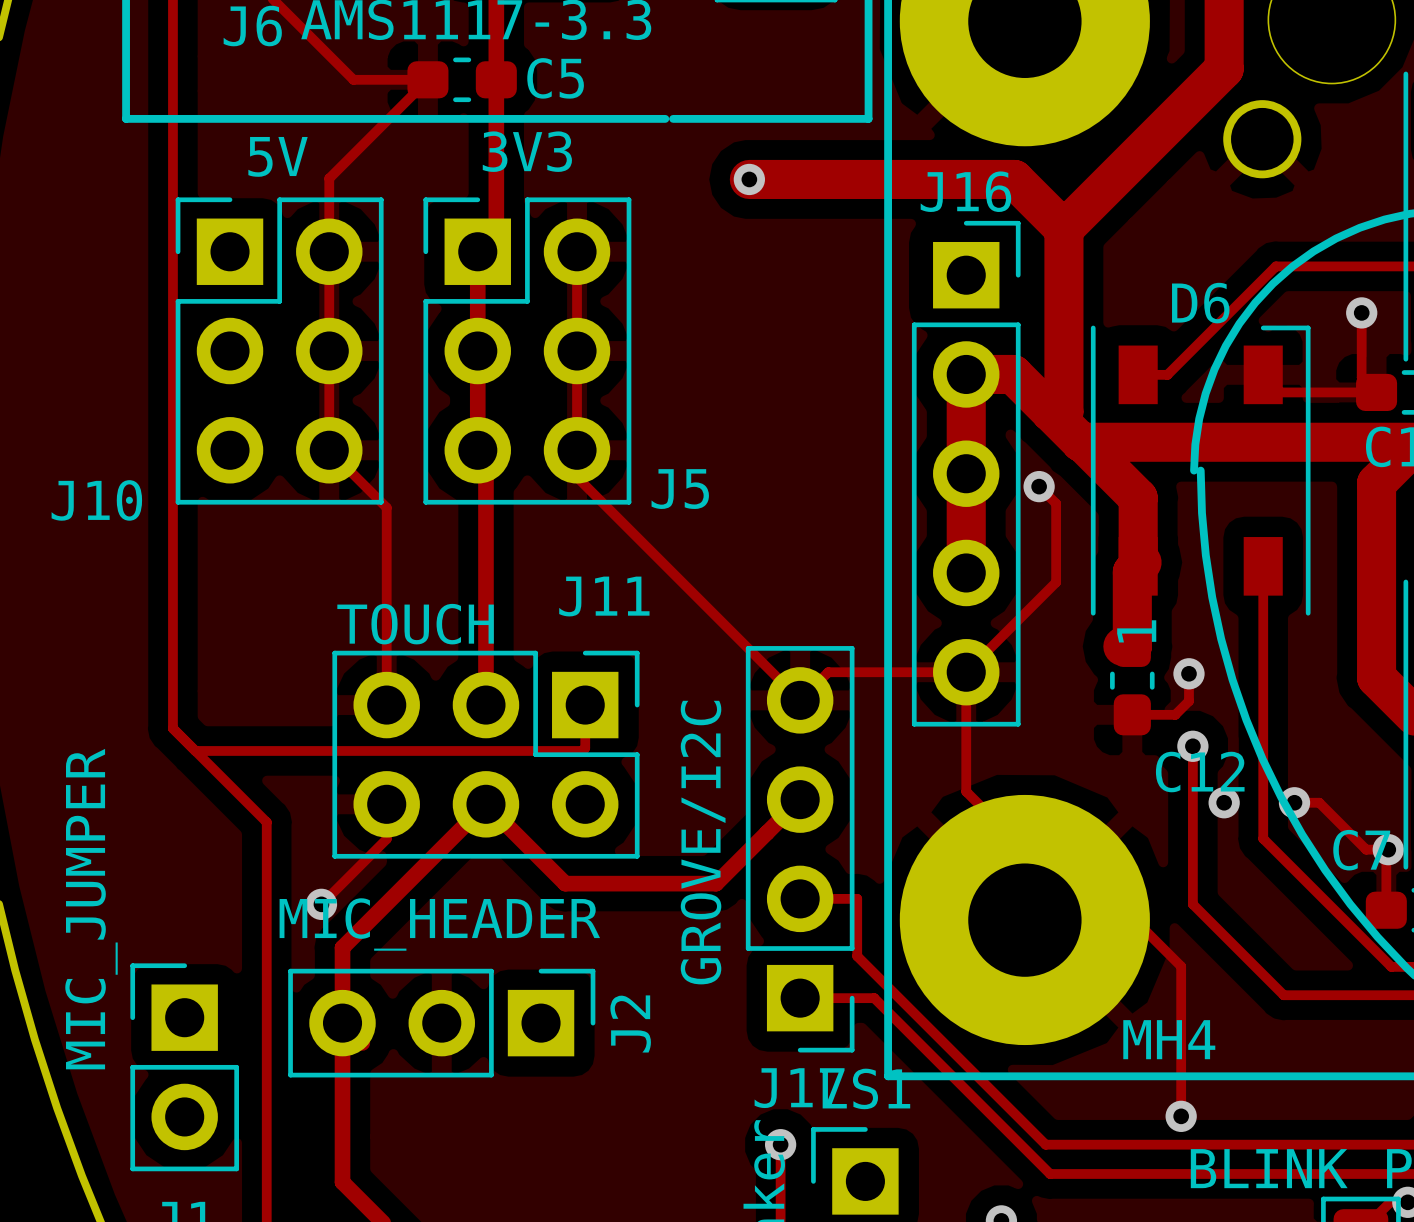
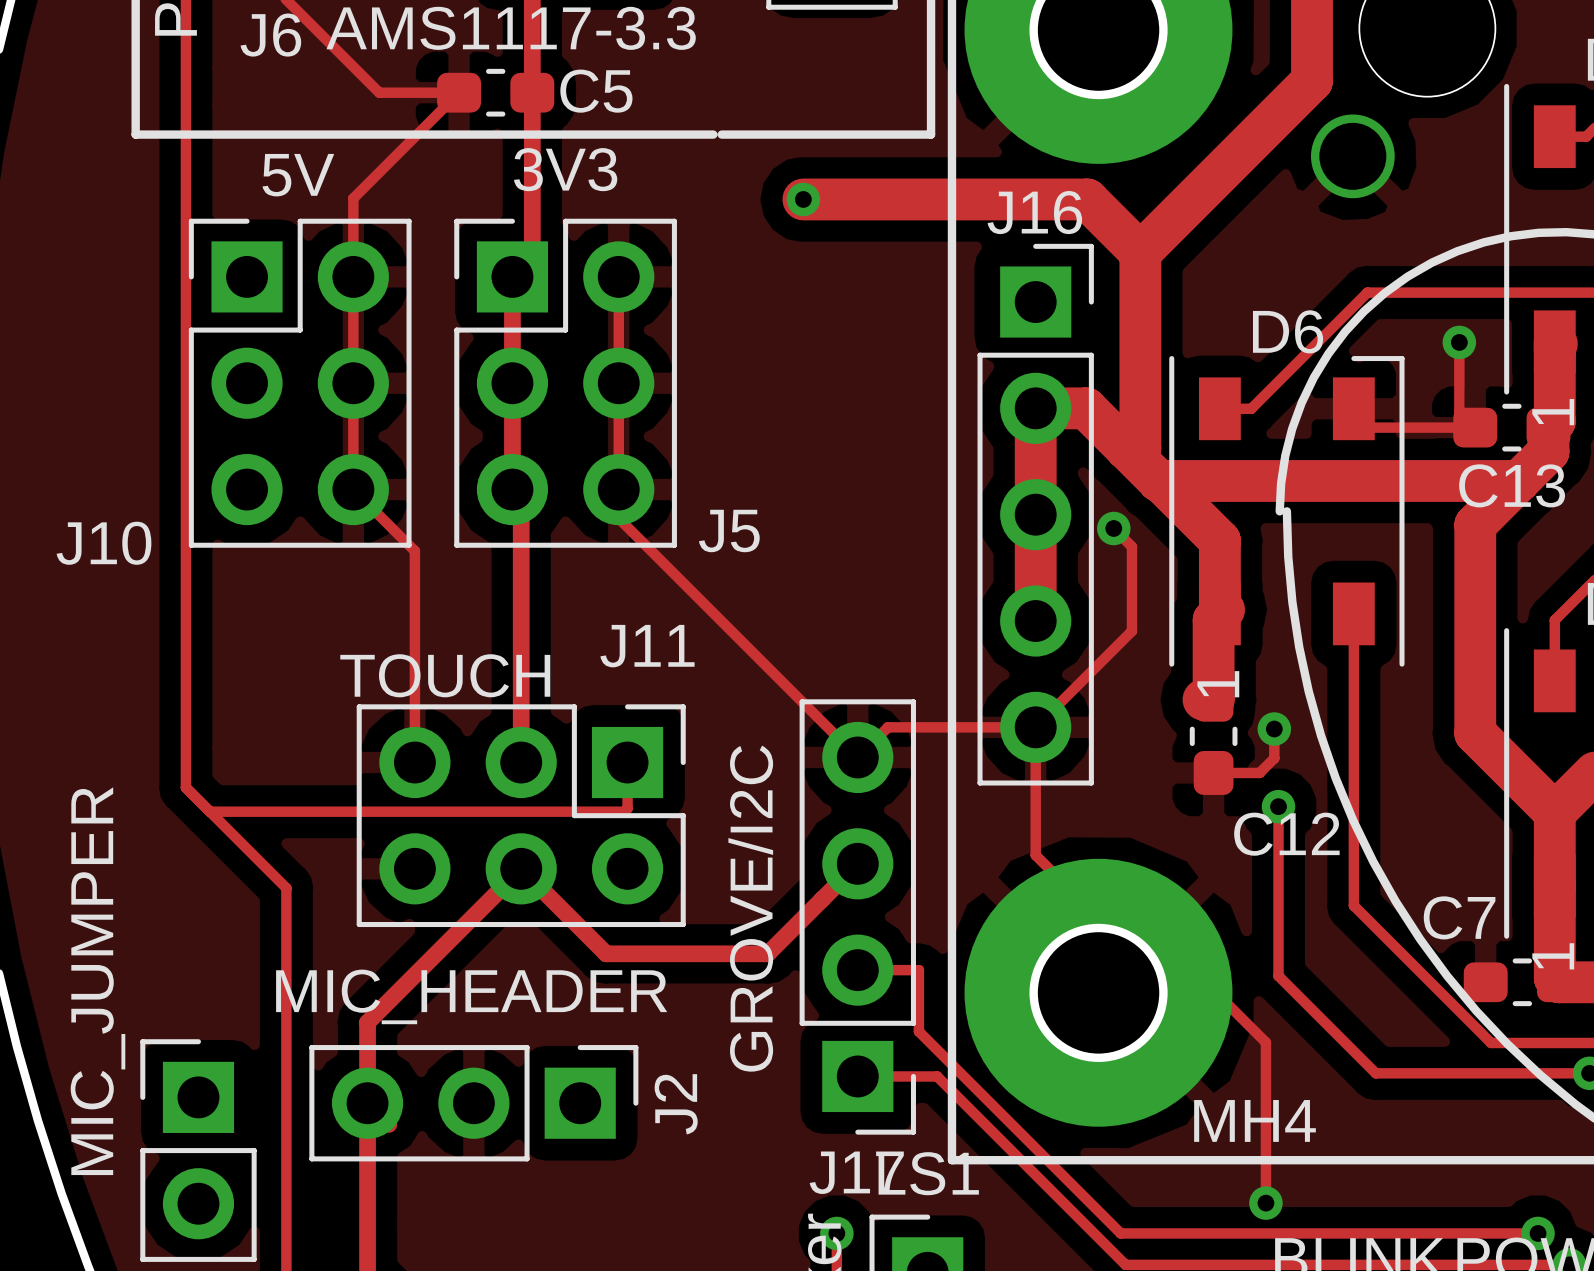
via: (1224, 802) -> none
track: (1294, 802) (1319, 802) (1366, 849) (1388, 849) (1386, 851) (1386, 910) -> none
via: (1294, 802) -> none
track: (386, 804) (386, 839) (321, 904) -> none
via: (1388, 849) -> none
via: (321, 904) -> none

